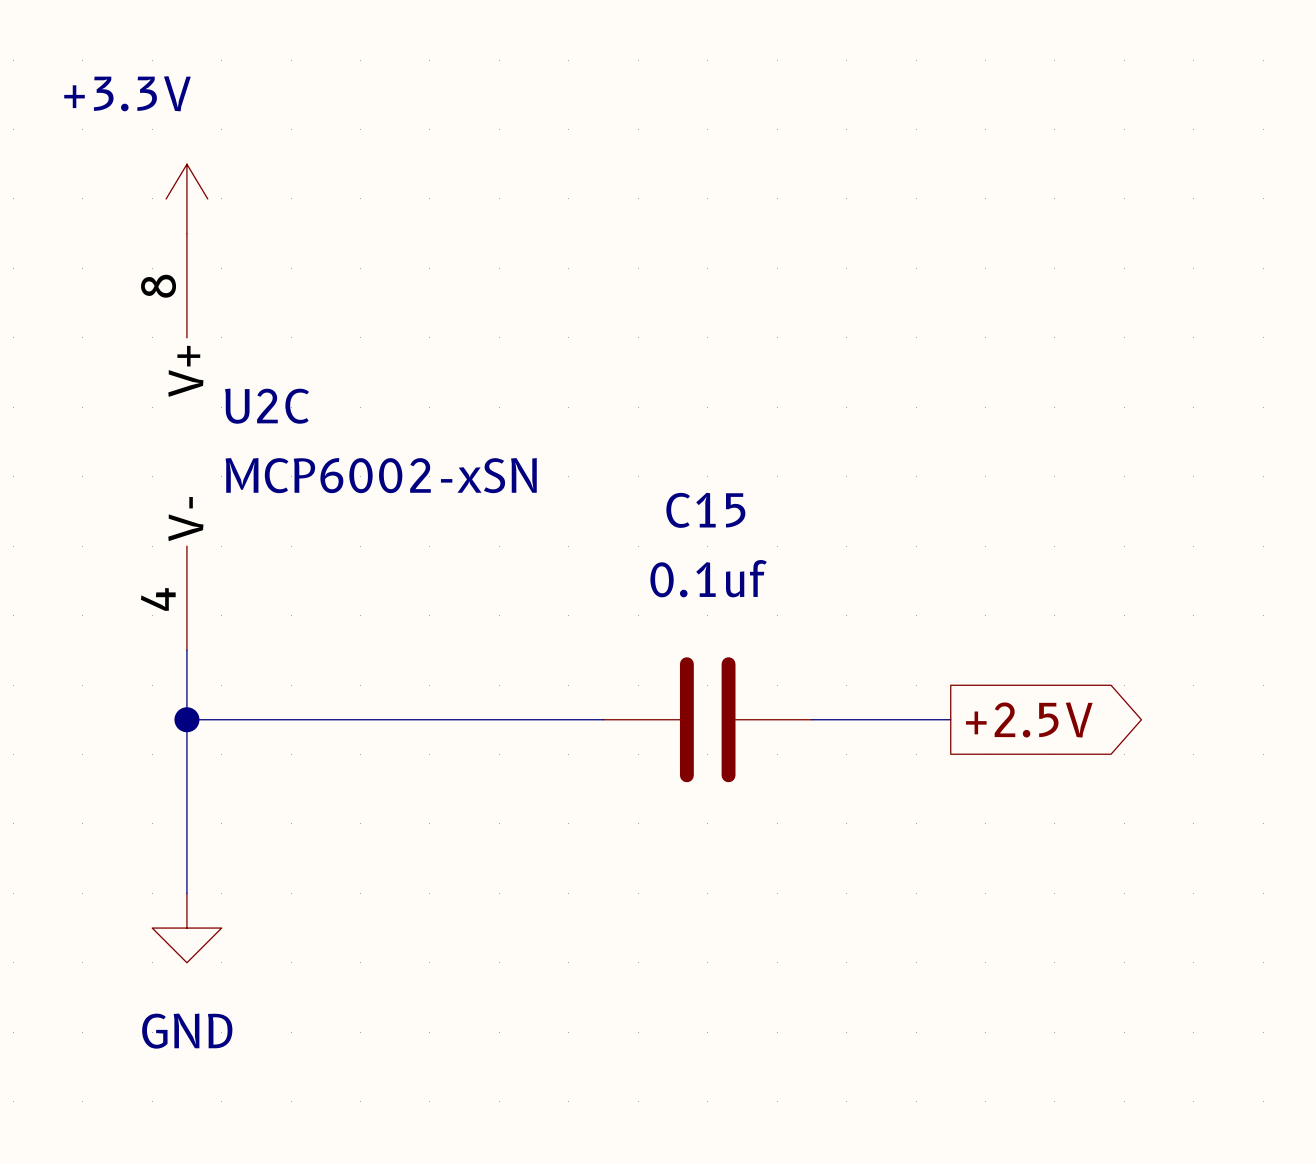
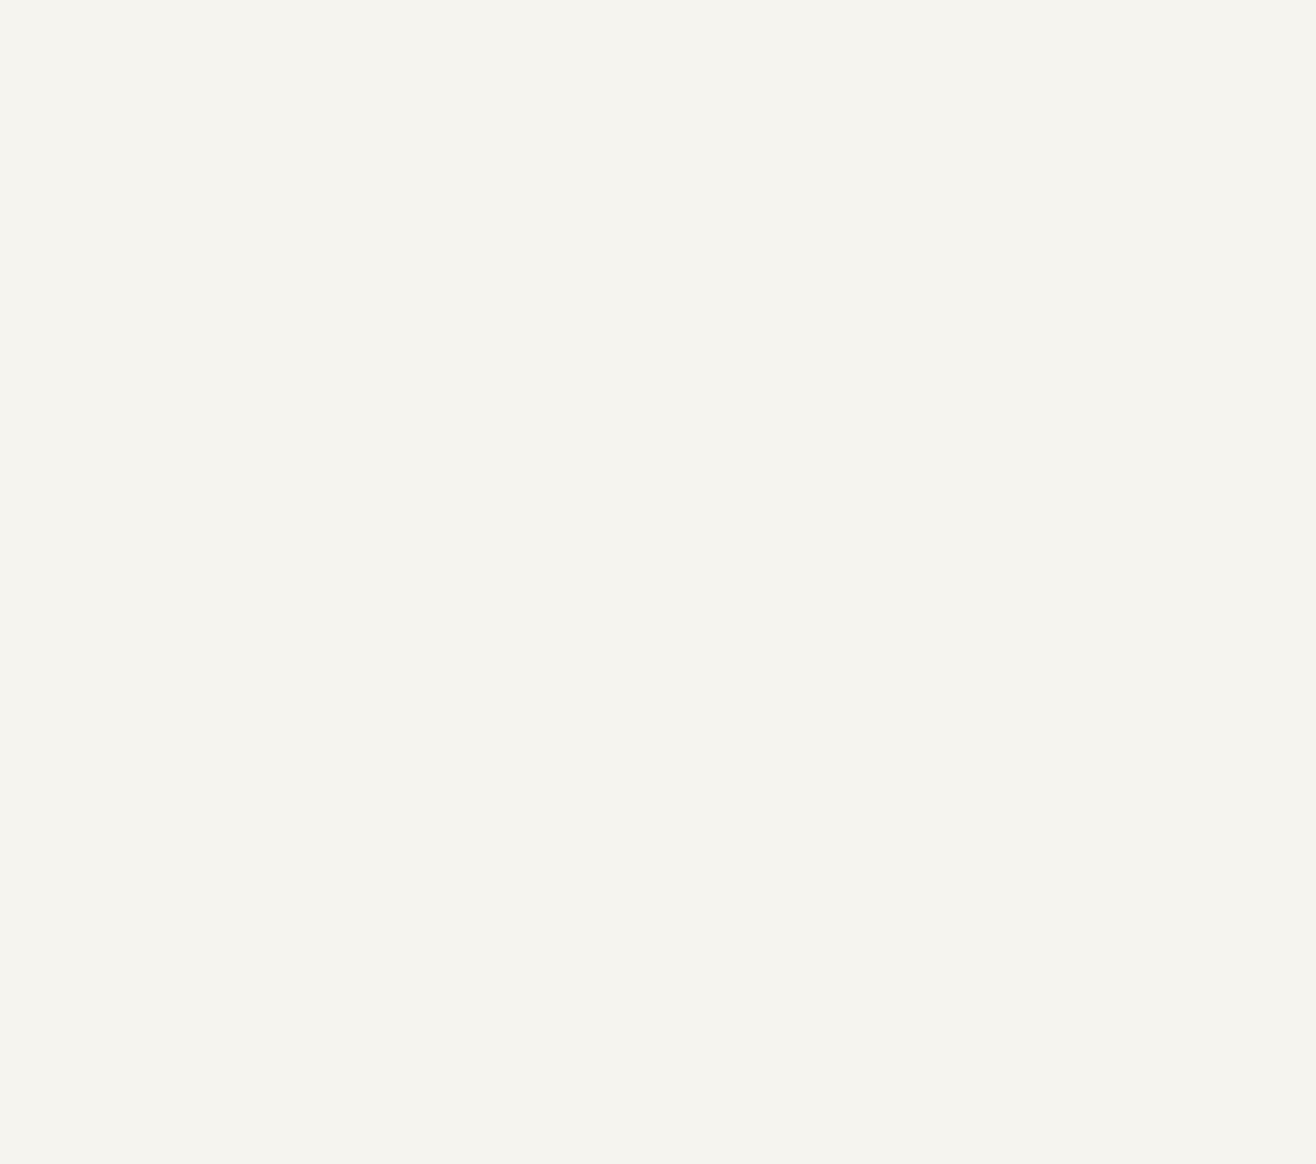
power symbol: +3.3V (186, 198) -> none
U2C: MCP6002-xSN (186, 442) -> none
wire: (186, 650) (186, 893) -> none
wire: (186, 719) (603, 719) -> none
junction: (186, 719) -> none
C15: 0.1uf (707, 719) -> none
wire: (811, 719) (950, 719) -> none
global label: +2.5V (1029, 719) -> none
power symbol: GND (186, 928) -> none

